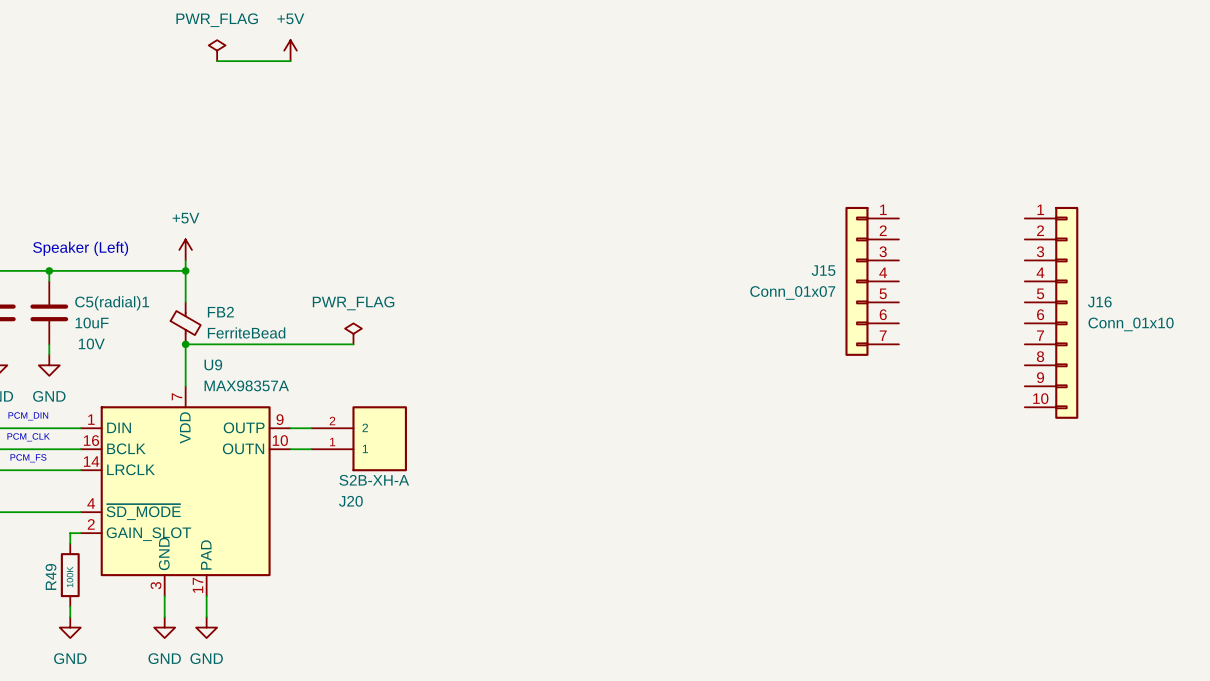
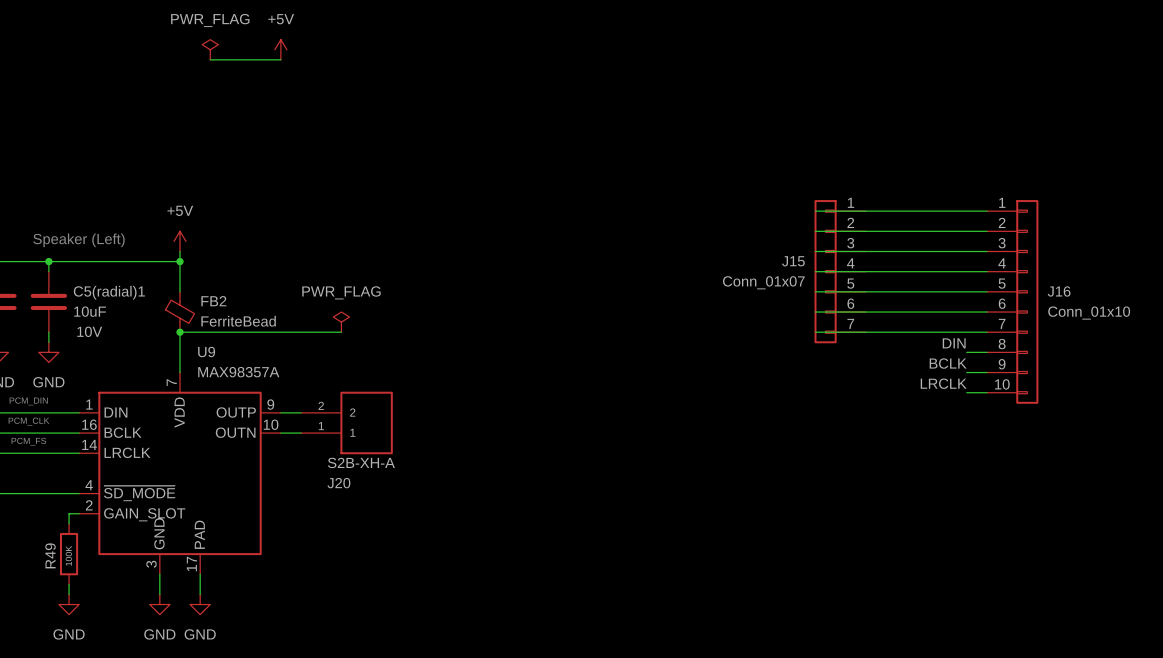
wire: none -> (815, 211) (986, 211)
wire: none -> (815, 231) (986, 231)
wire: none -> (815, 251) (986, 251)
wire: none -> (815, 271) (986, 271)
wire: none -> (815, 291) (986, 291)
wire: none -> (815, 312) (986, 312)
wire: none -> (815, 332) (986, 332)
label: none -> DIN (954, 343)
wire: none -> (966, 352) (986, 352)
label: none -> BCLK (948, 363)
wire: none -> (966, 372) (986, 372)
label: none -> LRCLK (943, 383)
wire: none -> (966, 392) (986, 392)

